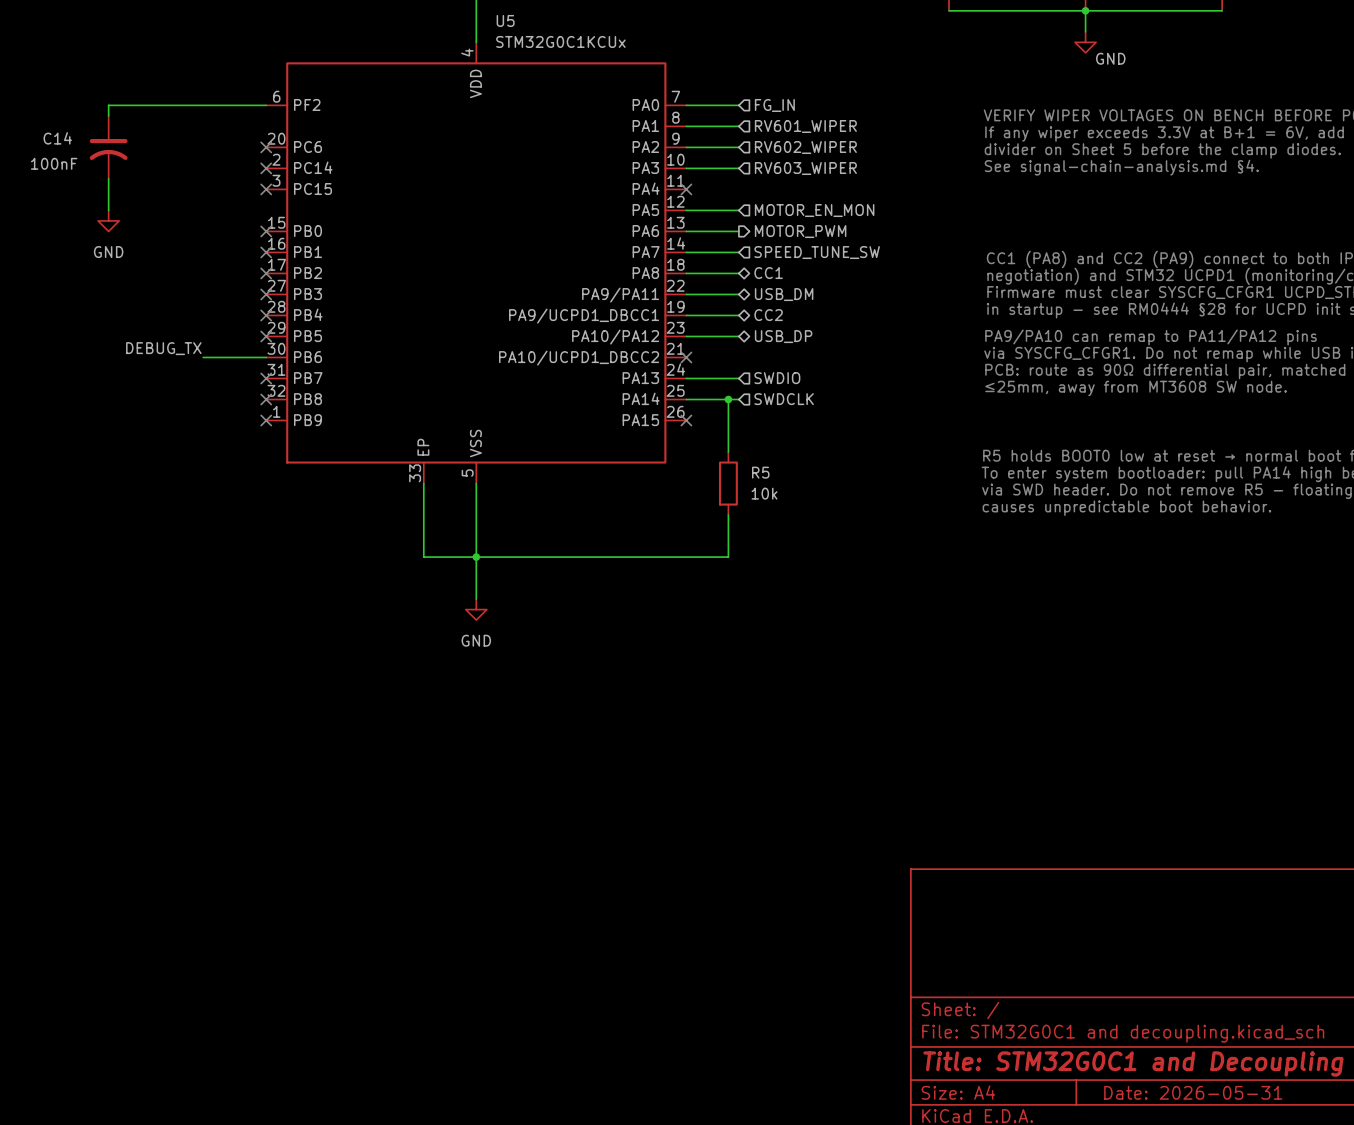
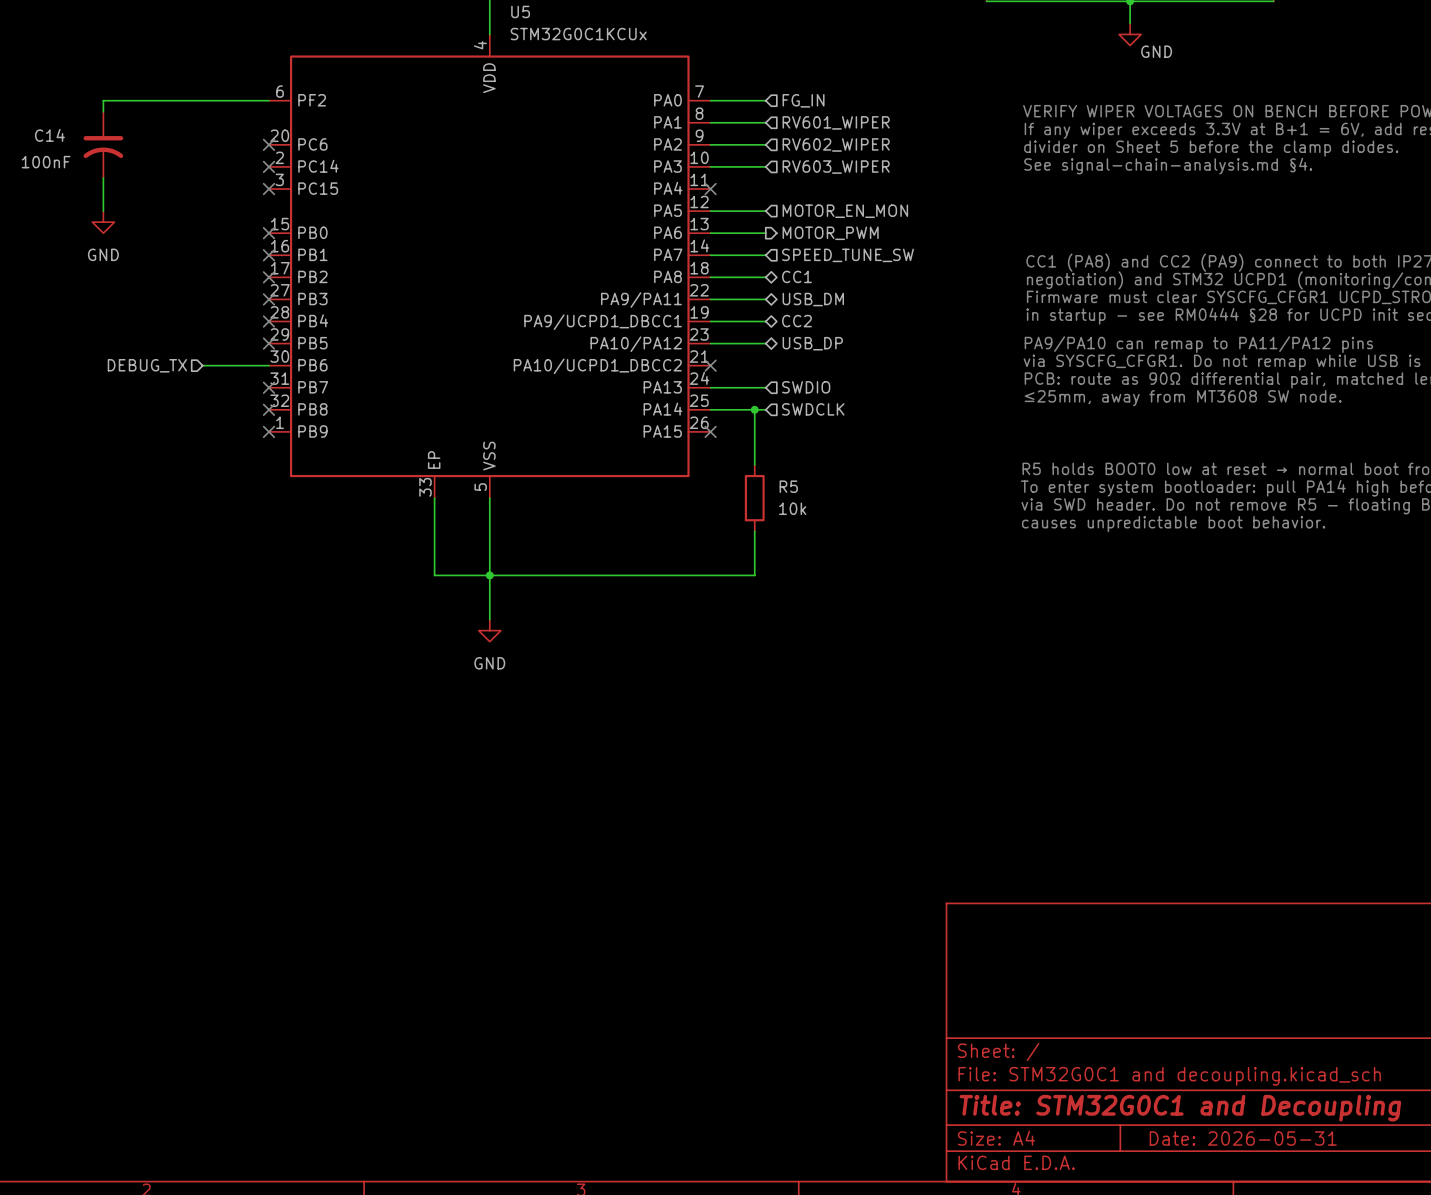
label: DEBUG_TX (163, 348) -> none
hierarchical label: none -> DEBUG_TX (147, 365)

